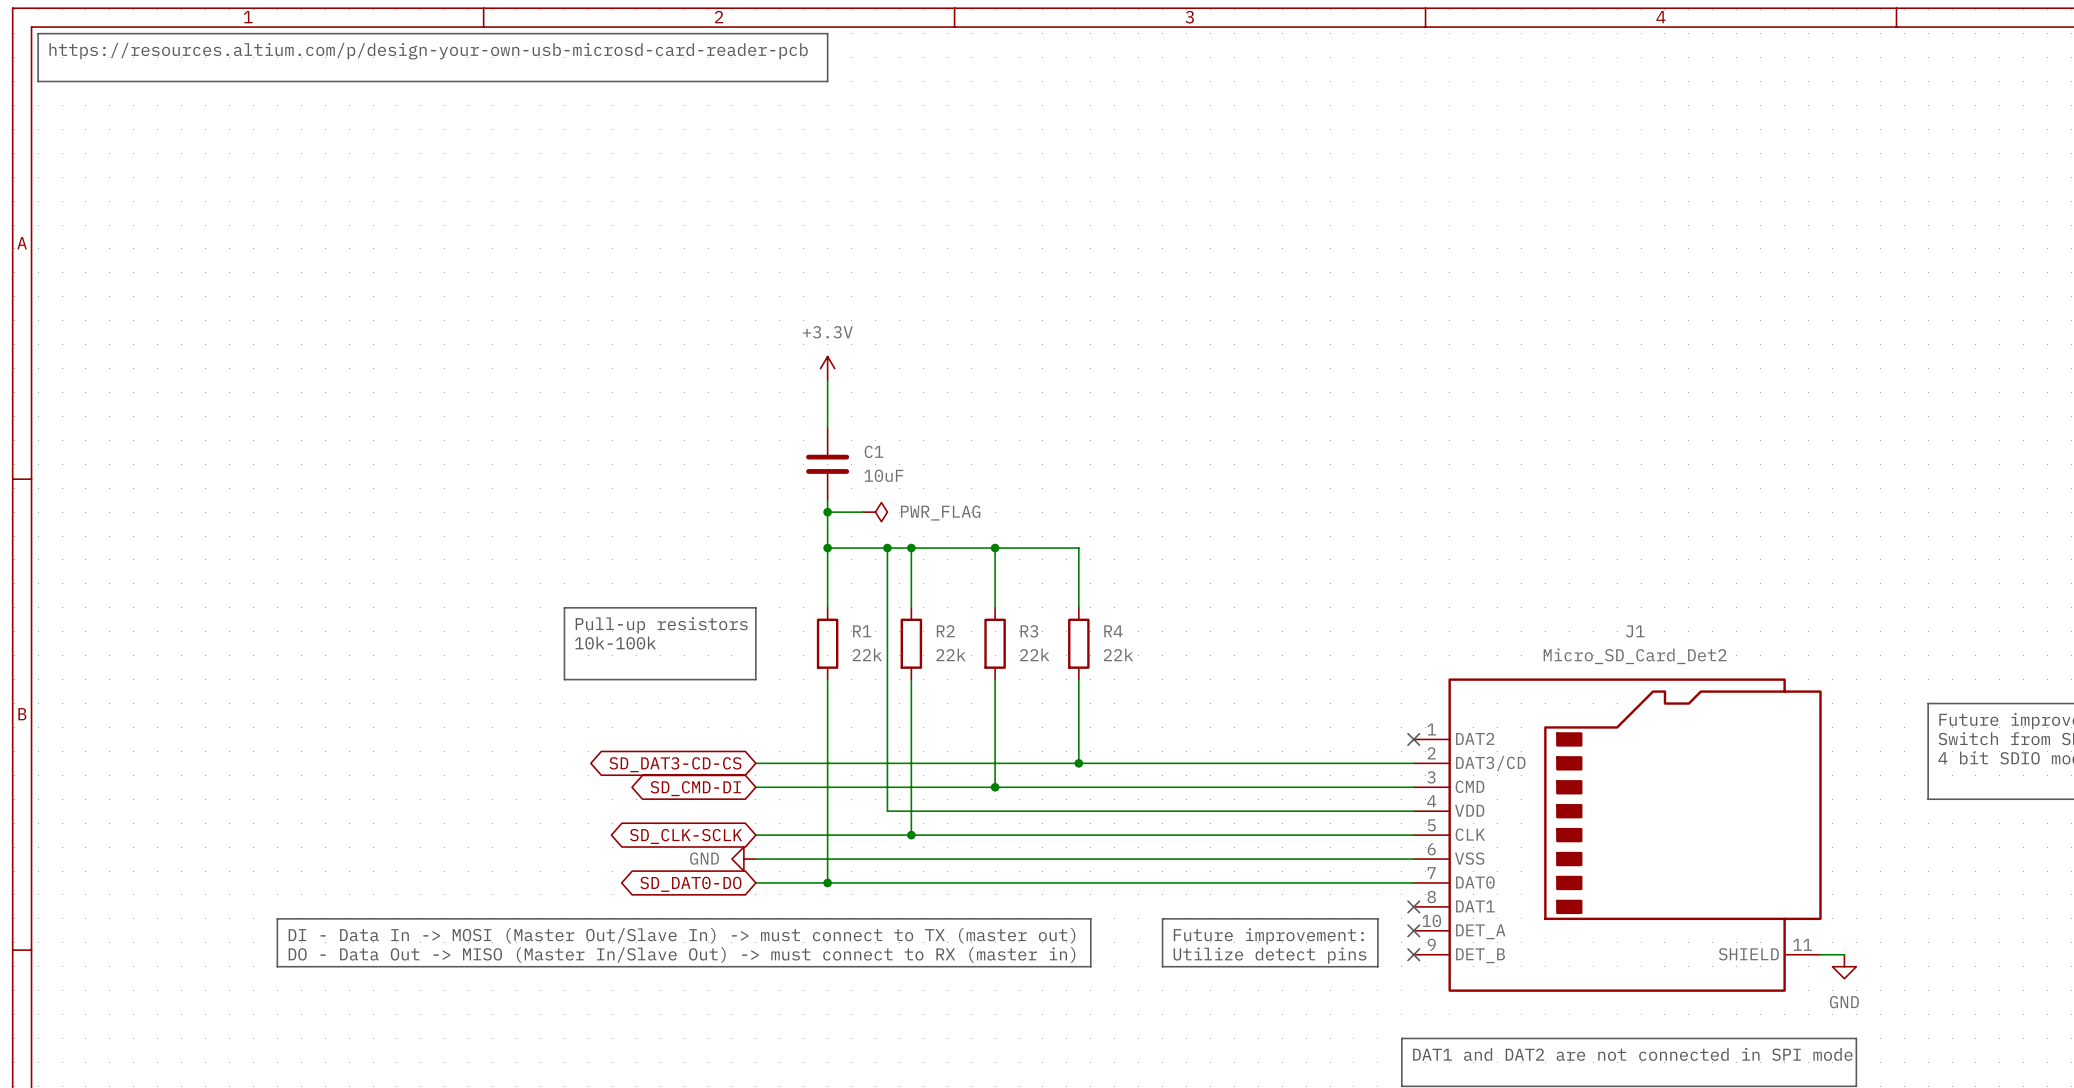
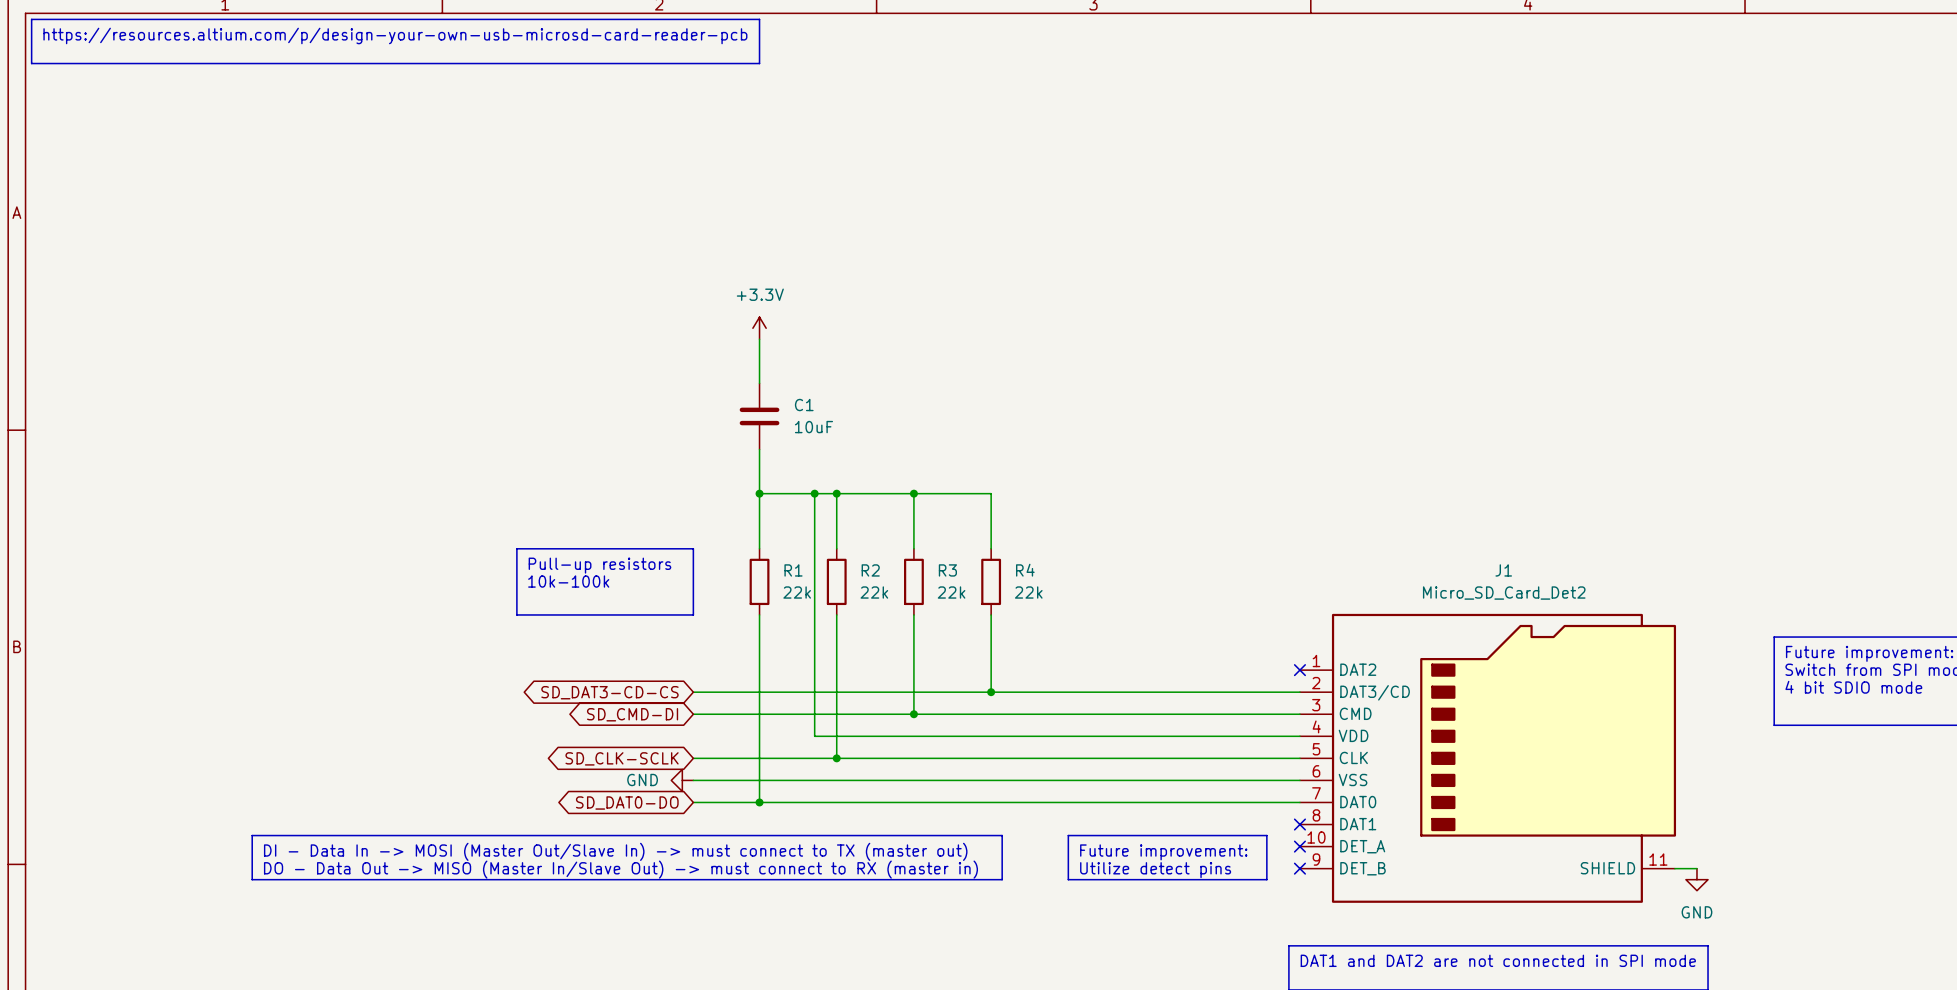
wire: (827, 512) (863, 512) -> none
junction: (827, 512) -> none
power symbol: PWR_FLAG (875, 512) -> none

